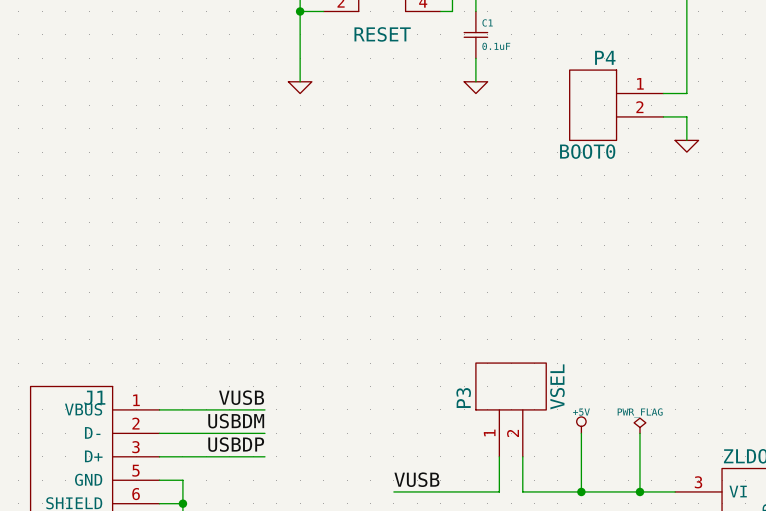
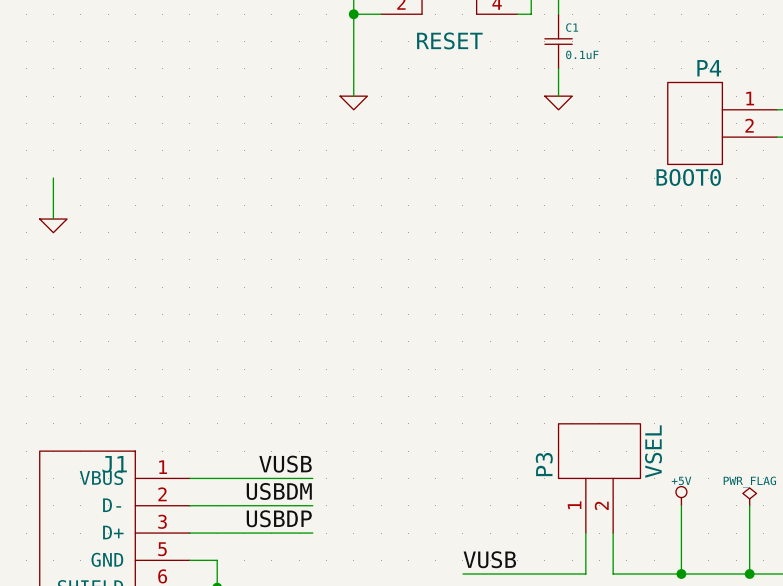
wire: none -> (53, 178) (53, 219)
power symbol: none -> (53, 225)

